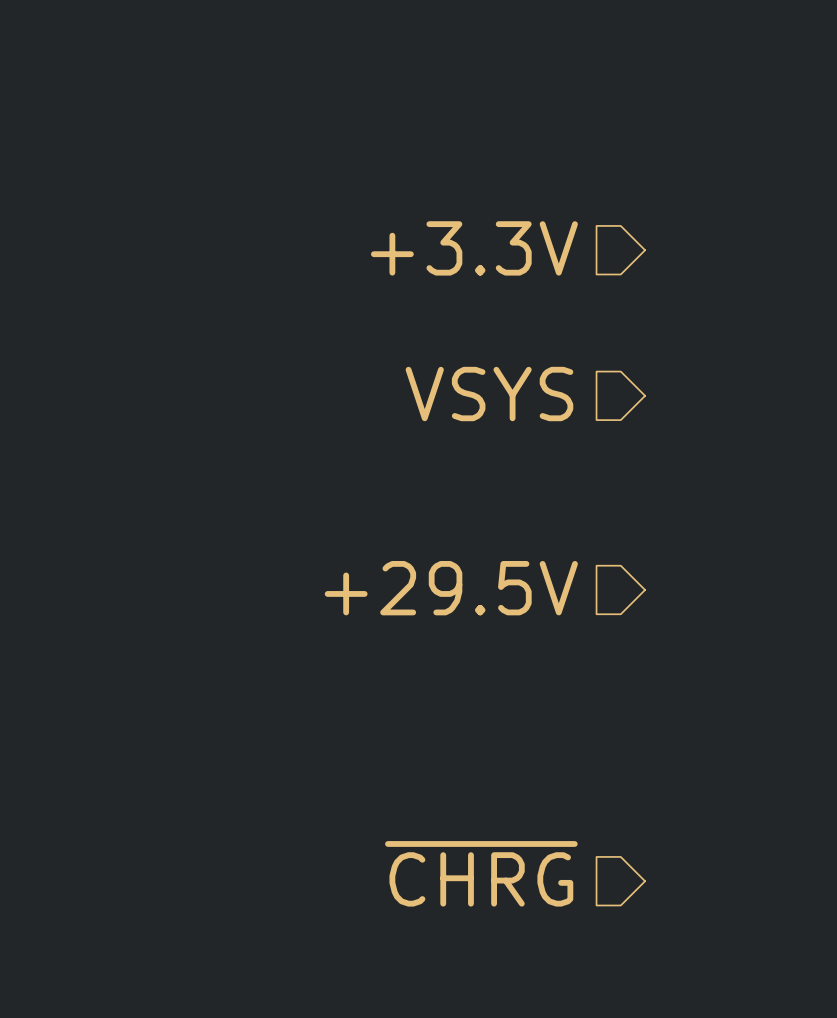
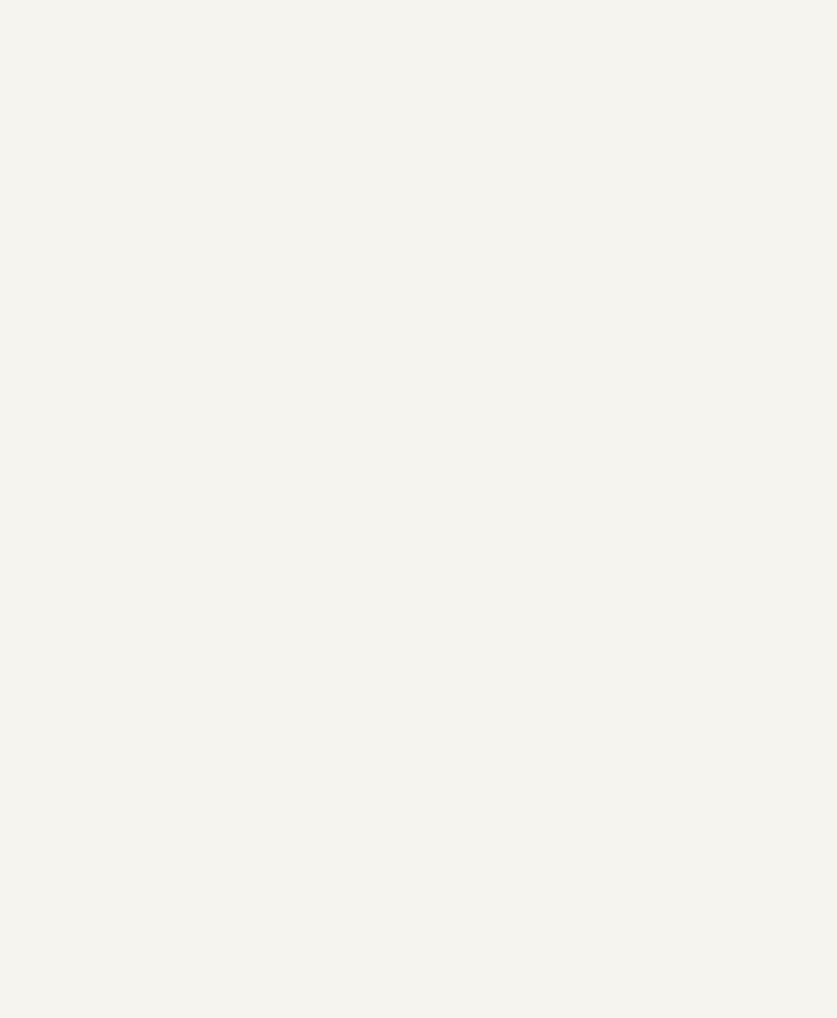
hierarchical label: +3.3V (474, 248) -> none
hierarchical label: VSYS (489, 394) -> none
hierarchical label: +29.5V (451, 588) -> none
hierarchical label: ~{CHRG} (481, 873) -> none

